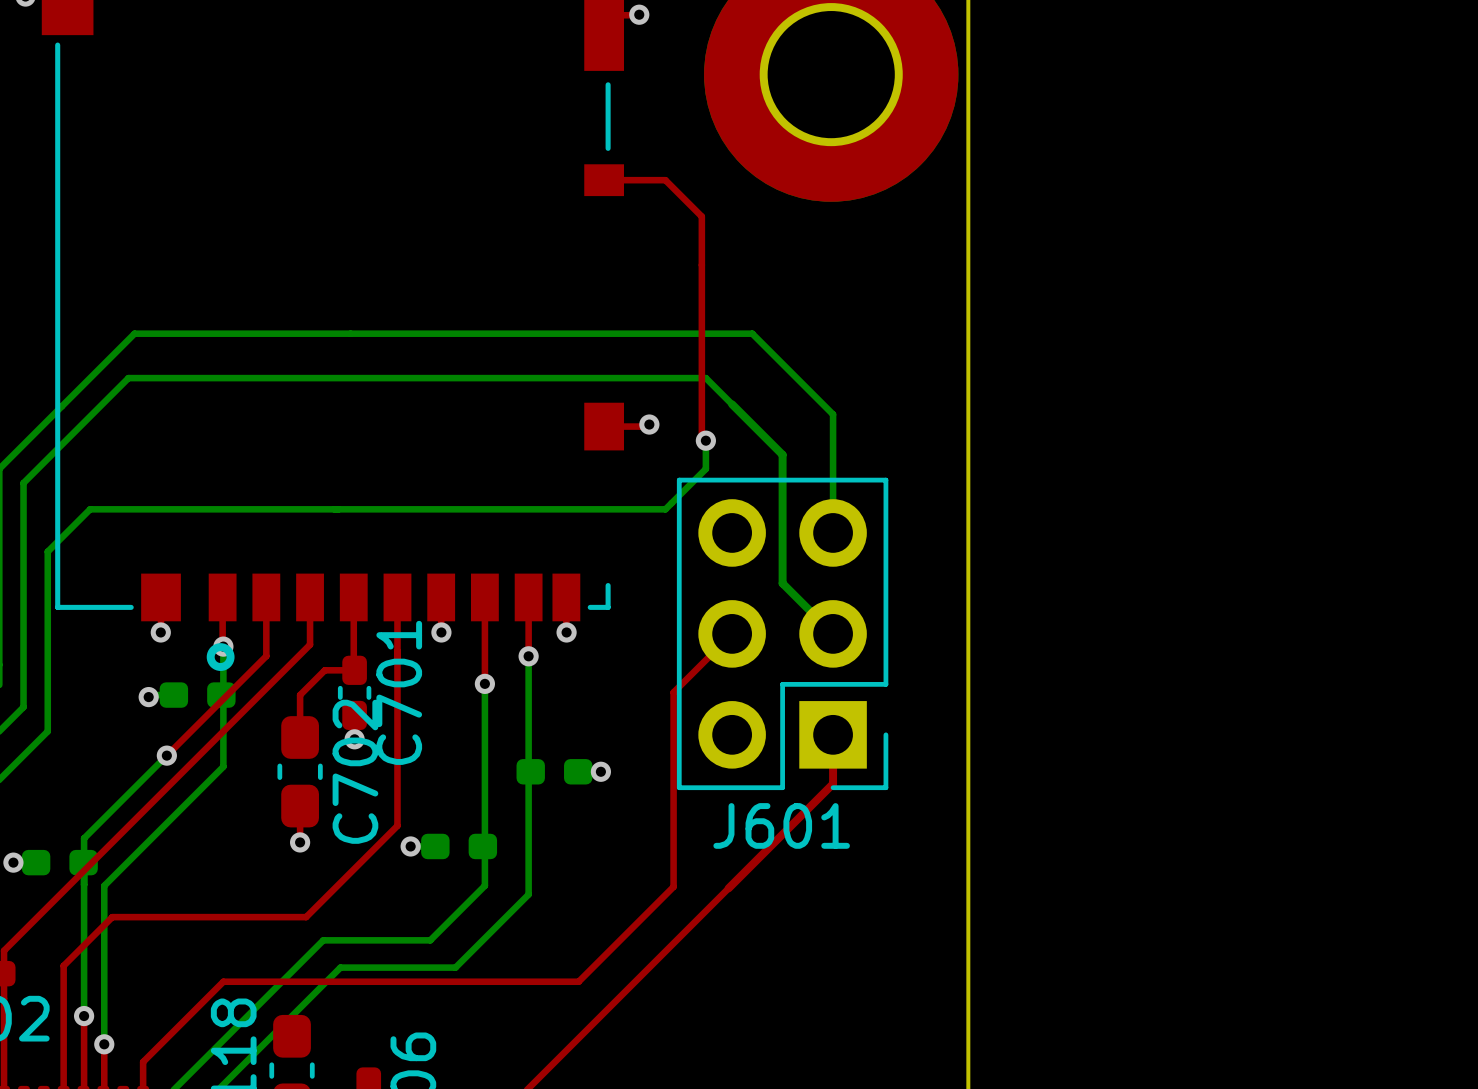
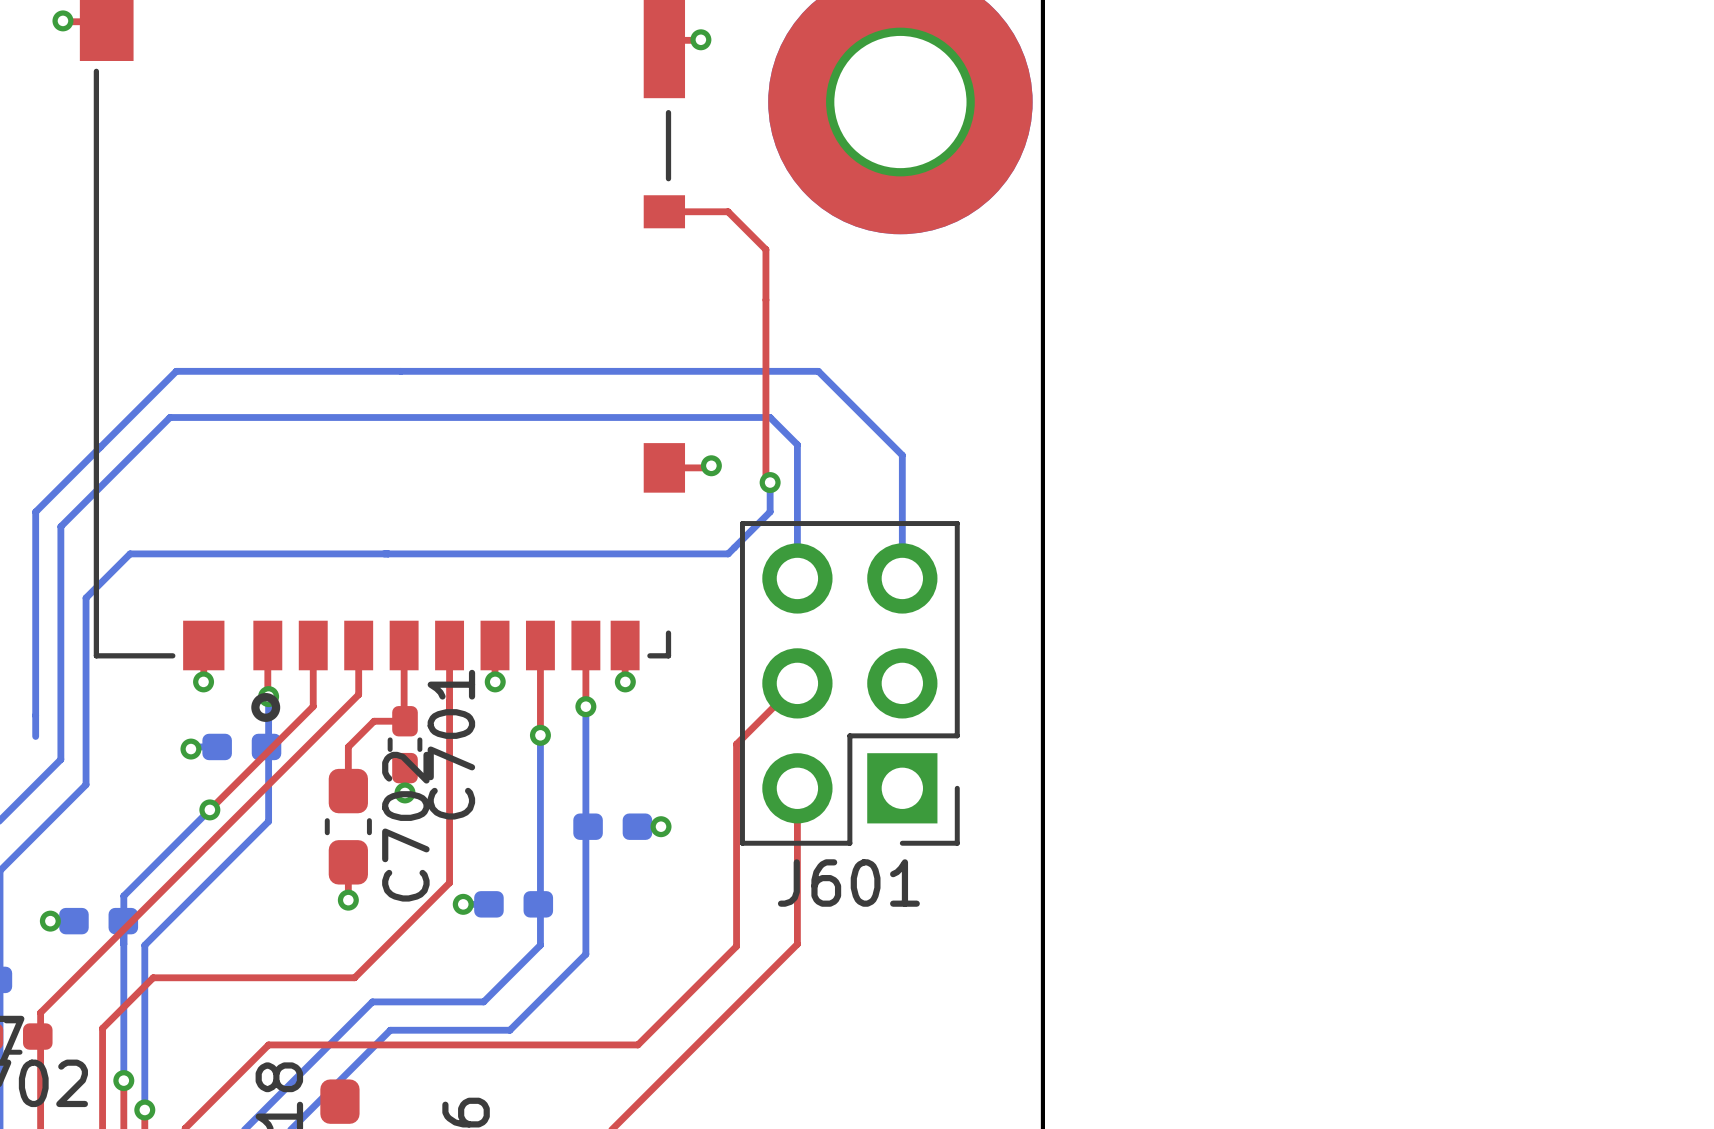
bottom track: (732, 404) (782, 454) (782, 583) (833, 633) -> (797, 444) (797, 578)
top track: none -> (797, 788) (797, 944)
top track: (833, 734) (833, 783) (728, 888) -> none

